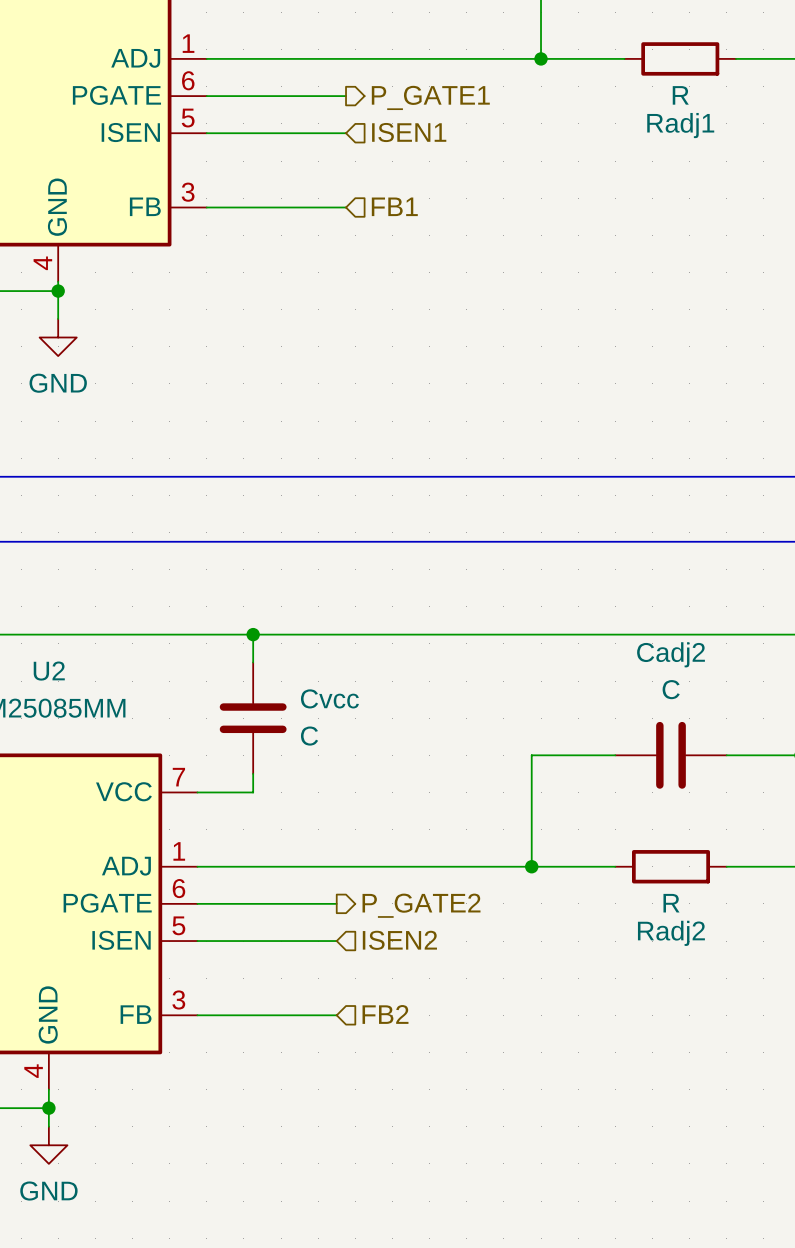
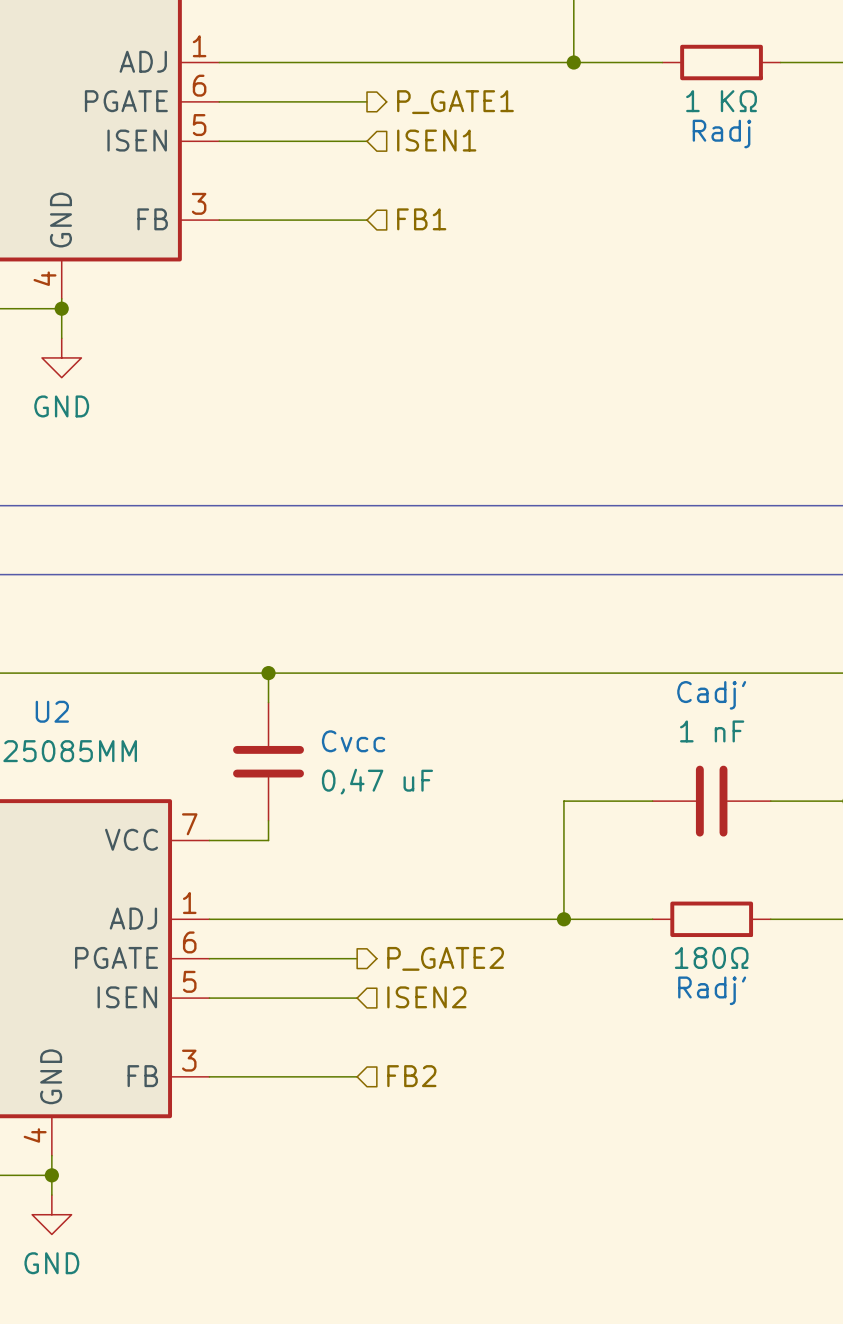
Radj1 value: R (680, 95) -> 1 KΩ (721, 101)
Radj1 name: Radj1 (680, 125) -> Radj (722, 133)
Cadj2 name: Cadj2 (671, 654) -> Cadj' (711, 695)
Cadj2 value: C (671, 689) -> 1 nF (712, 731)
Cvcc value: C (309, 736) -> 0,47 uF (377, 781)
Radj2 value: R (671, 903) -> 180Ω (711, 957)
Radj2 name: Radj2 (671, 933) -> Radj' (712, 990)

